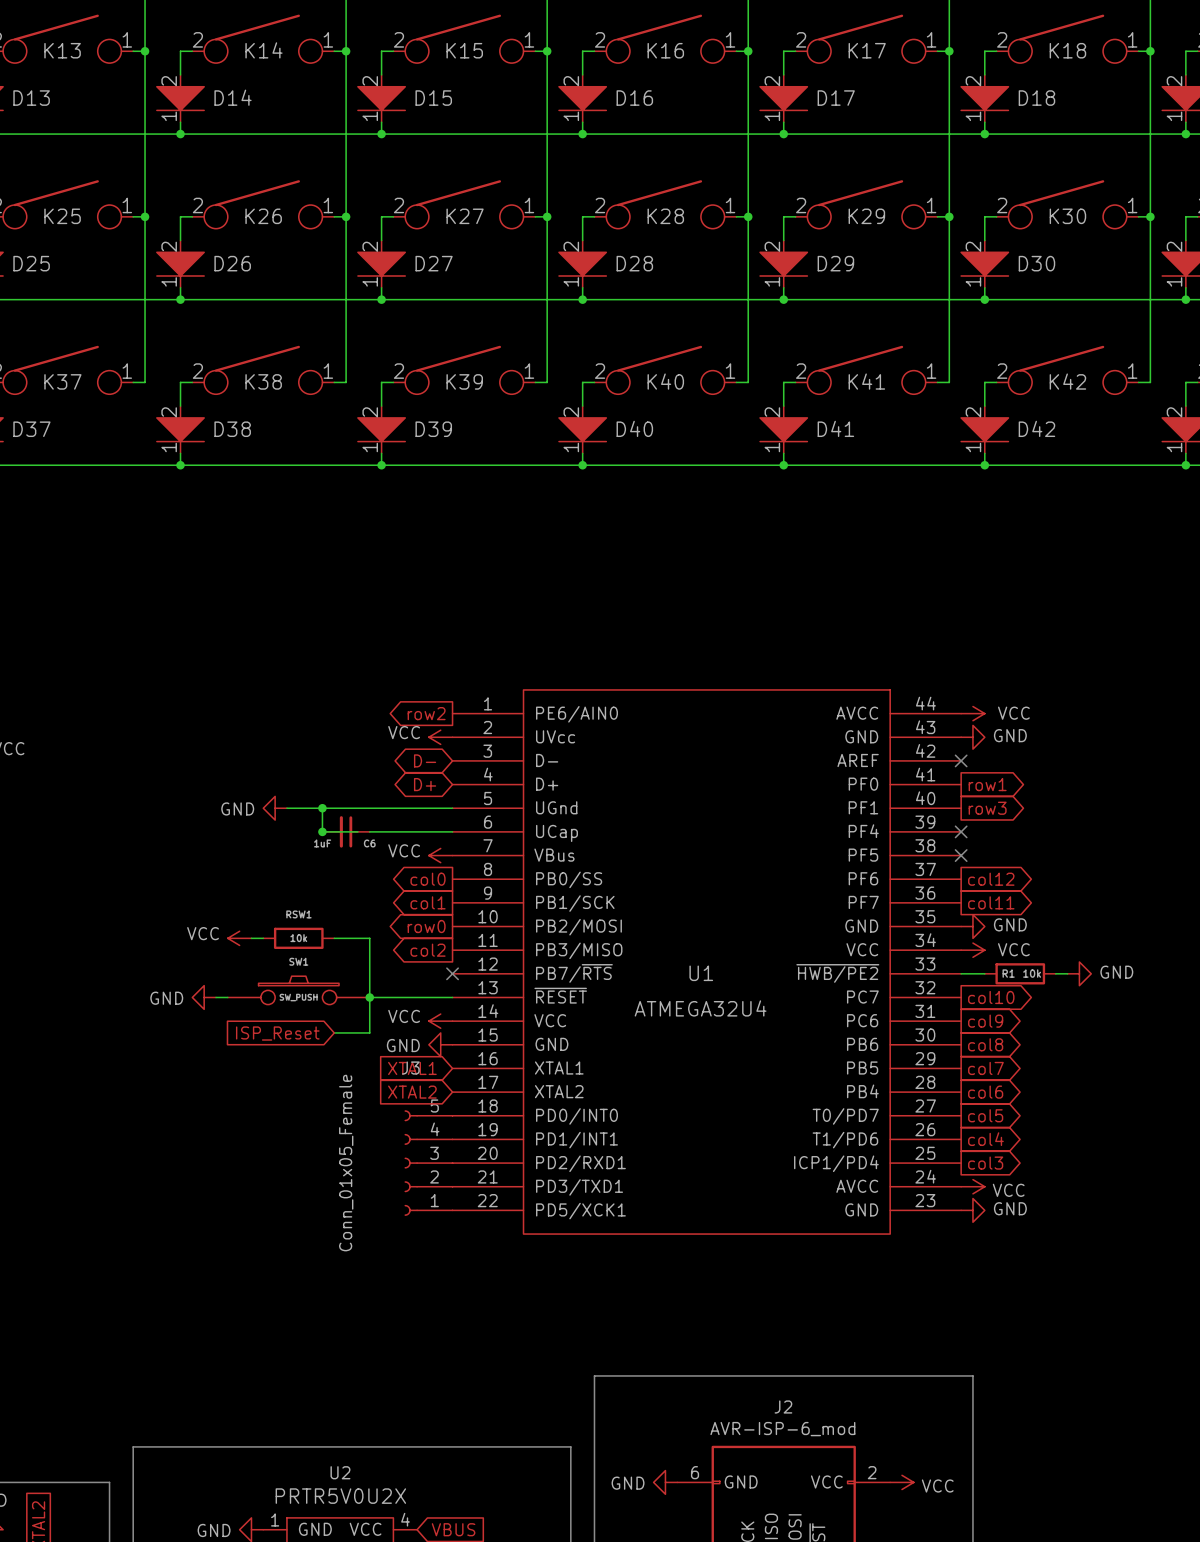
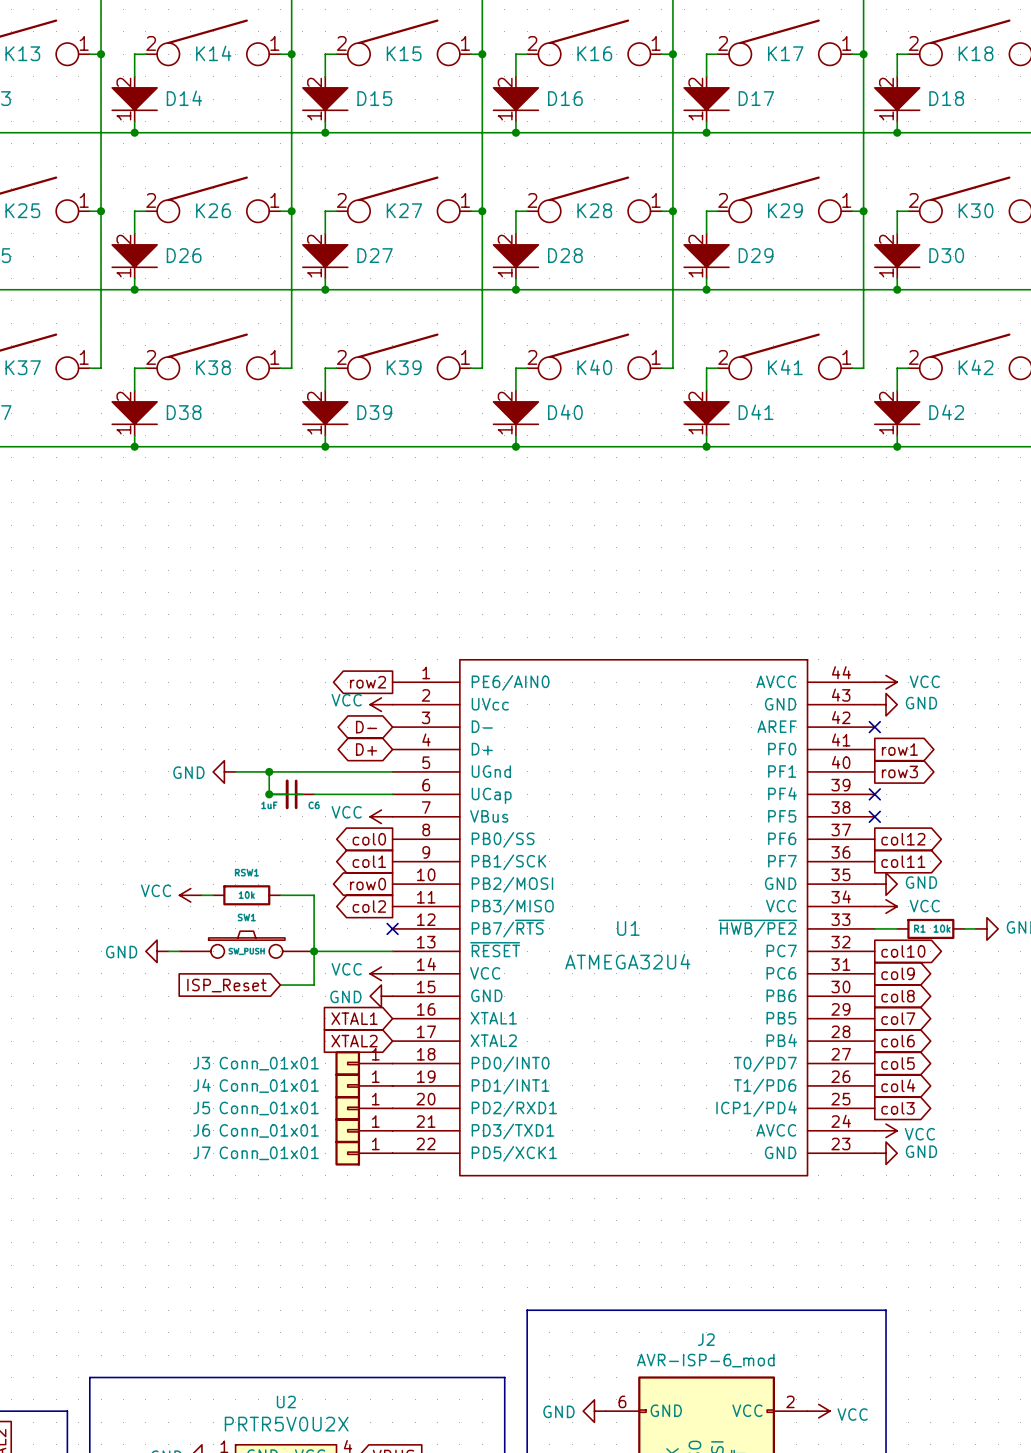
J3 name position: J3 (410, 1068) -> J3 (201, 1063)
J3 symbol: [404, 1110, 453, 1216] -> [335, 1051, 393, 1076]
J4: none -> Conn_01x01 (363, 1085)
J3 value: Conn_01x05_Female (346, 1163) -> Conn_01x01 (269, 1063)
J5: none -> Conn_01x01 (363, 1108)
J6: none -> Conn_01x01 (363, 1130)
J7: none -> Conn_01x01 (363, 1153)

